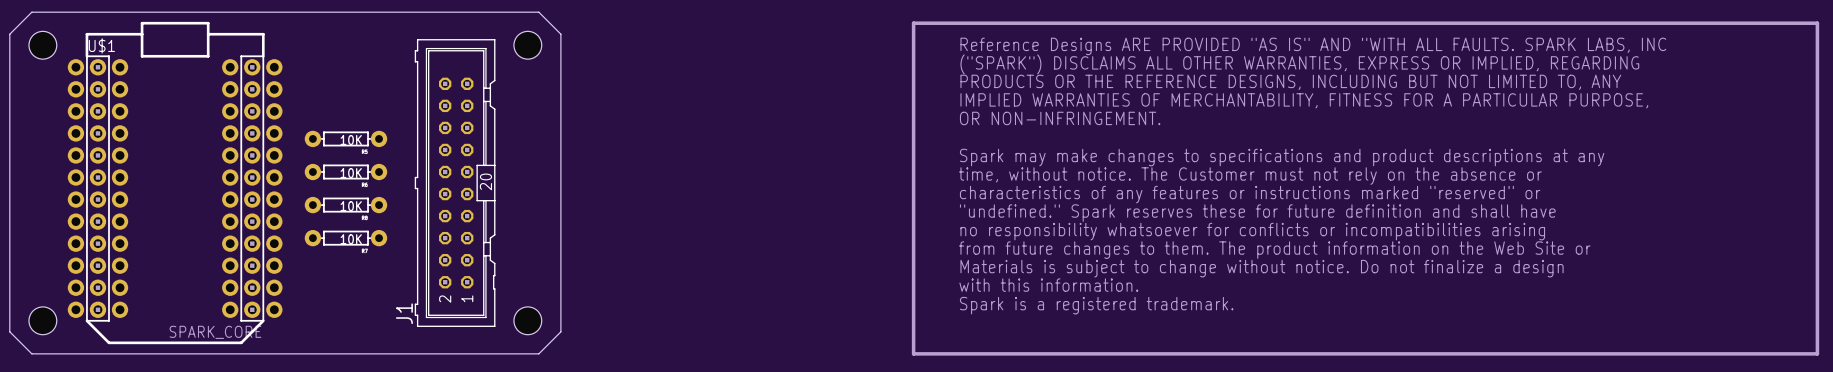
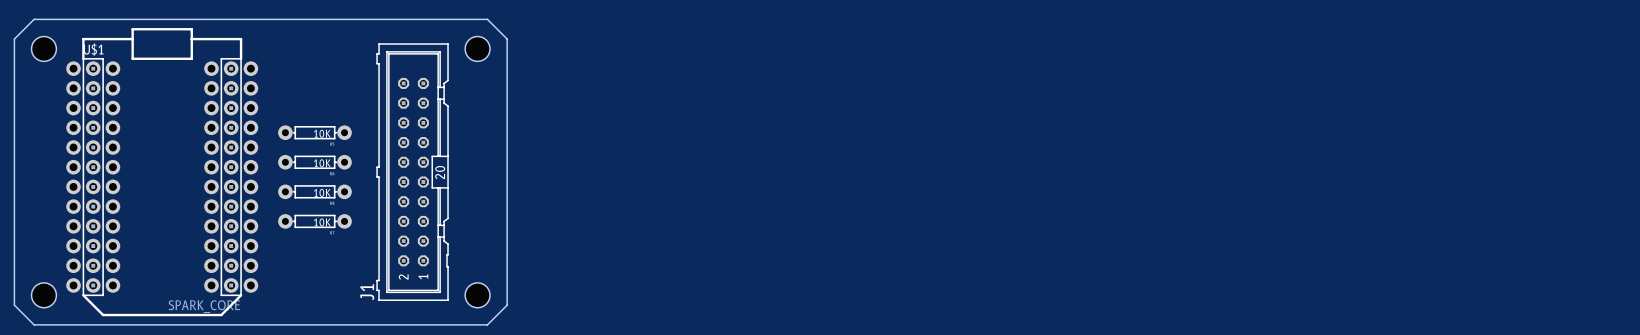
line: (913, 23) (913, 353) (1817, 353) (1817, 23) (913, 23) -> none
text: Reference Designs ARE PROVIDED "AS IS" AND "WITH ALL FAULTS. SPARK LABS, INC (1313, 46) -> none
text: ("SPARK") DISCLAIMS ALL OTHER WARRANTIES, EXPRESS OR IMPLIED, REGARDING (1299, 64) -> none
text: PRODUCTS OR THE REFERENCE DESIGNS, INCLUDING BUT NOT LIMITED TO, ANY (1290, 82) -> none
text: IMPLIED WARRANTIES OF MERCHANTABILITY, FITNESS FOR A PARTICULAR PURPOSE, (1304, 100) -> none
text: OR NON-INFRINGEMENT. (1060, 118) -> none
text: Spark may make changes to specifications and product descriptions at any (1282, 157) -> none
text: time, without notice. The Customer must not rely on the absence or (1250, 176) -> none
text: characteristics of any features or instructions marked "reserved" or (1250, 194) -> none
text: "undefined." Spark reserves these for future definition and shall have (1257, 213) -> none
text: no responsibility whatsoever for conflicts or incompatibilities arising (1252, 231) -> none
text: from future changes to them. The product information on the Web Site or (1274, 250) -> none
text: Materials is subject to change without notice. Do not finalize a design (1262, 268) -> none
text: with this information. (1048, 285) -> none
text: Spark is a registered trademark. (1096, 305) -> none

